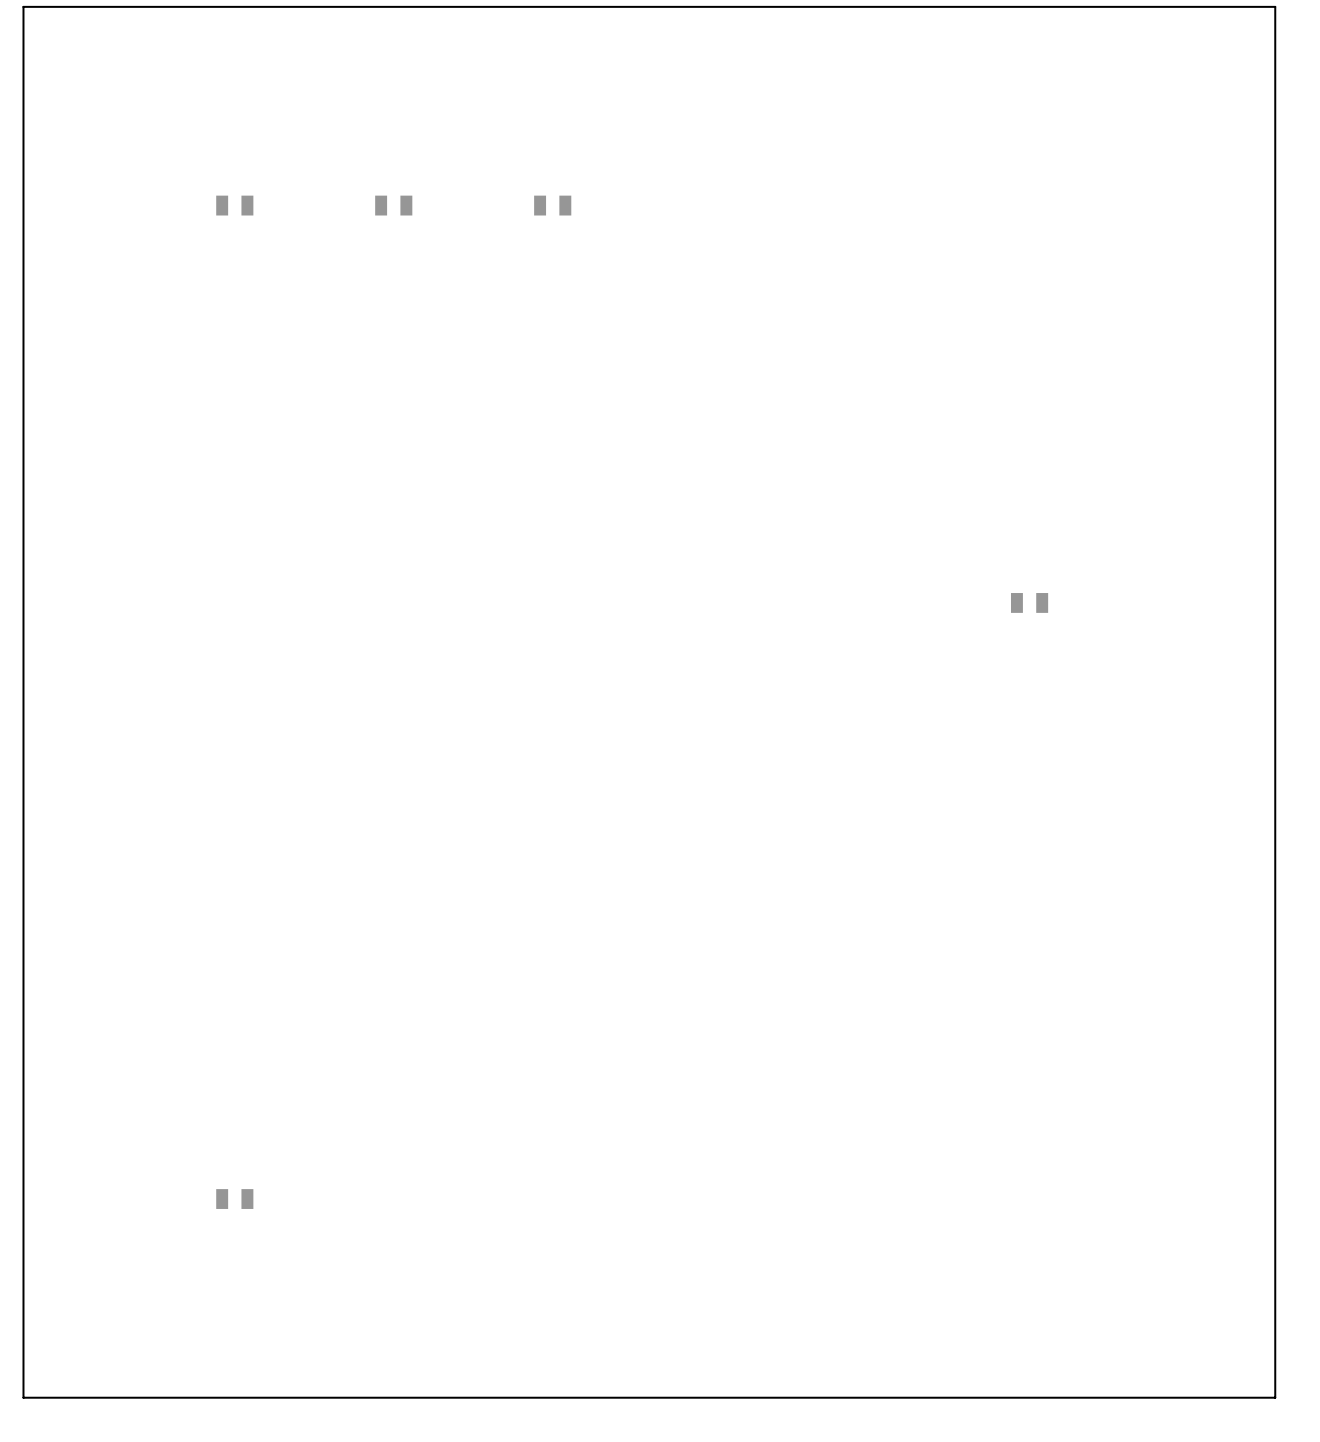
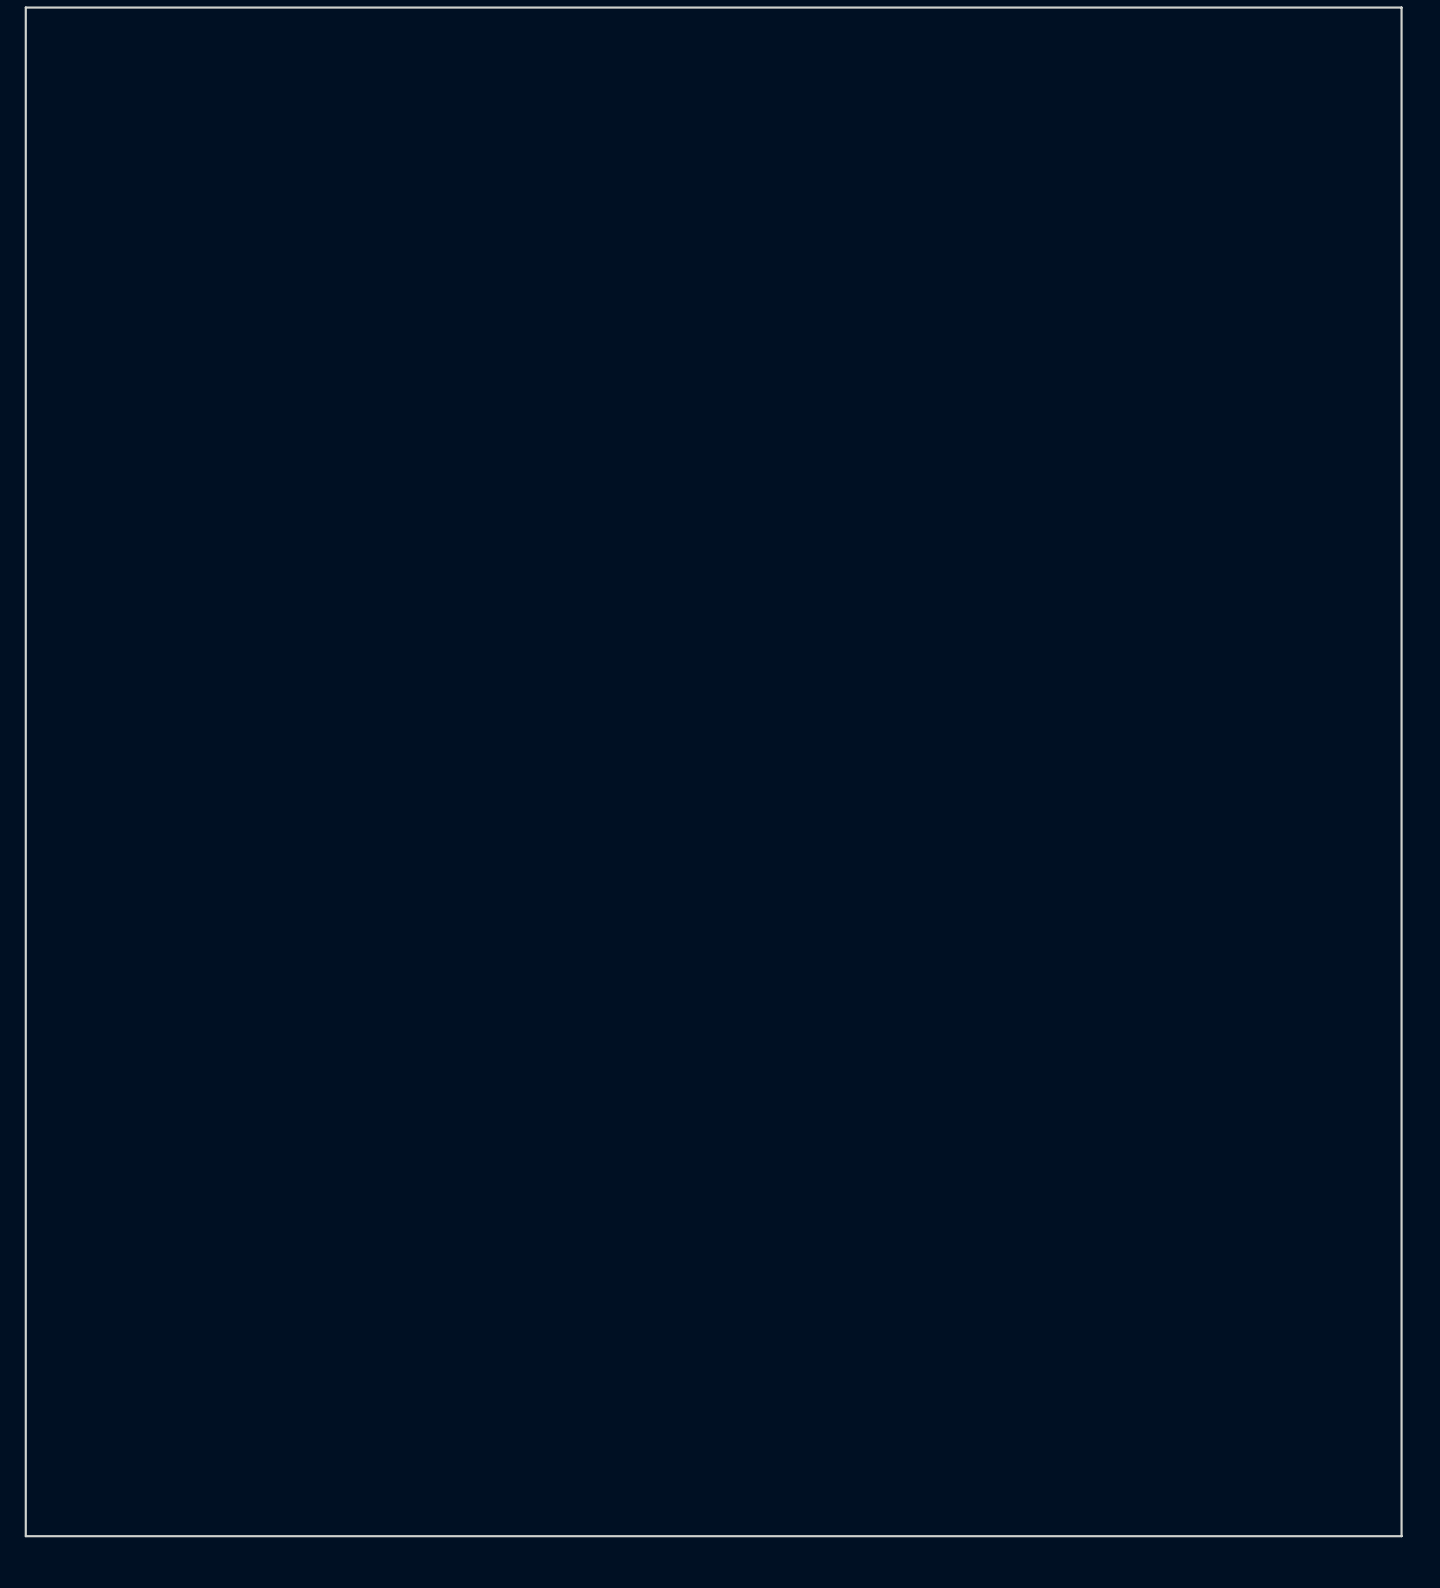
part: (234, 205) -> none
part: (393, 205) -> none
part: (552, 205) -> none
part: (1029, 602) -> none
part: (234, 1199) -> none

